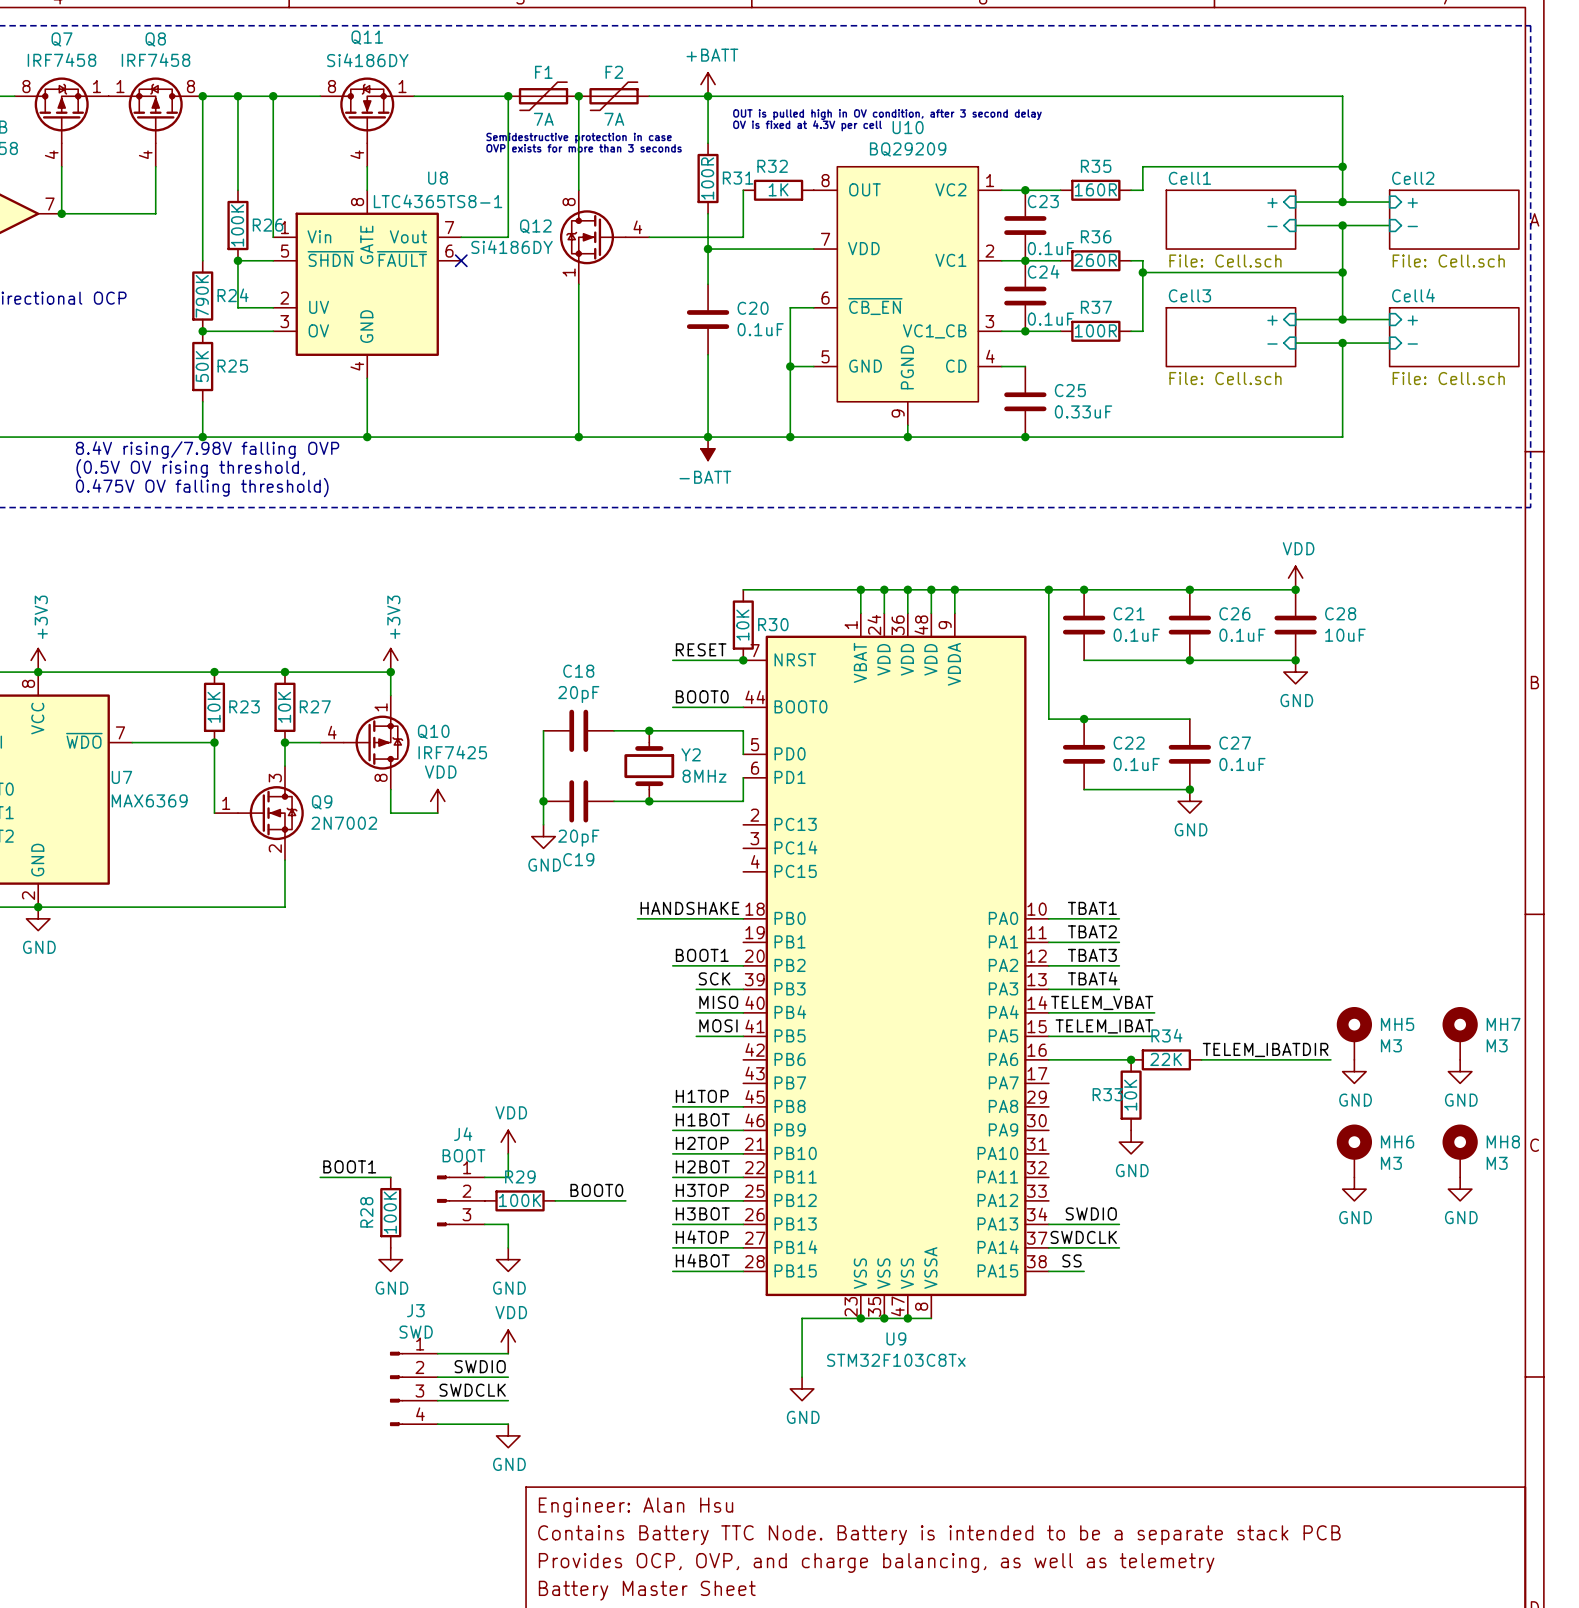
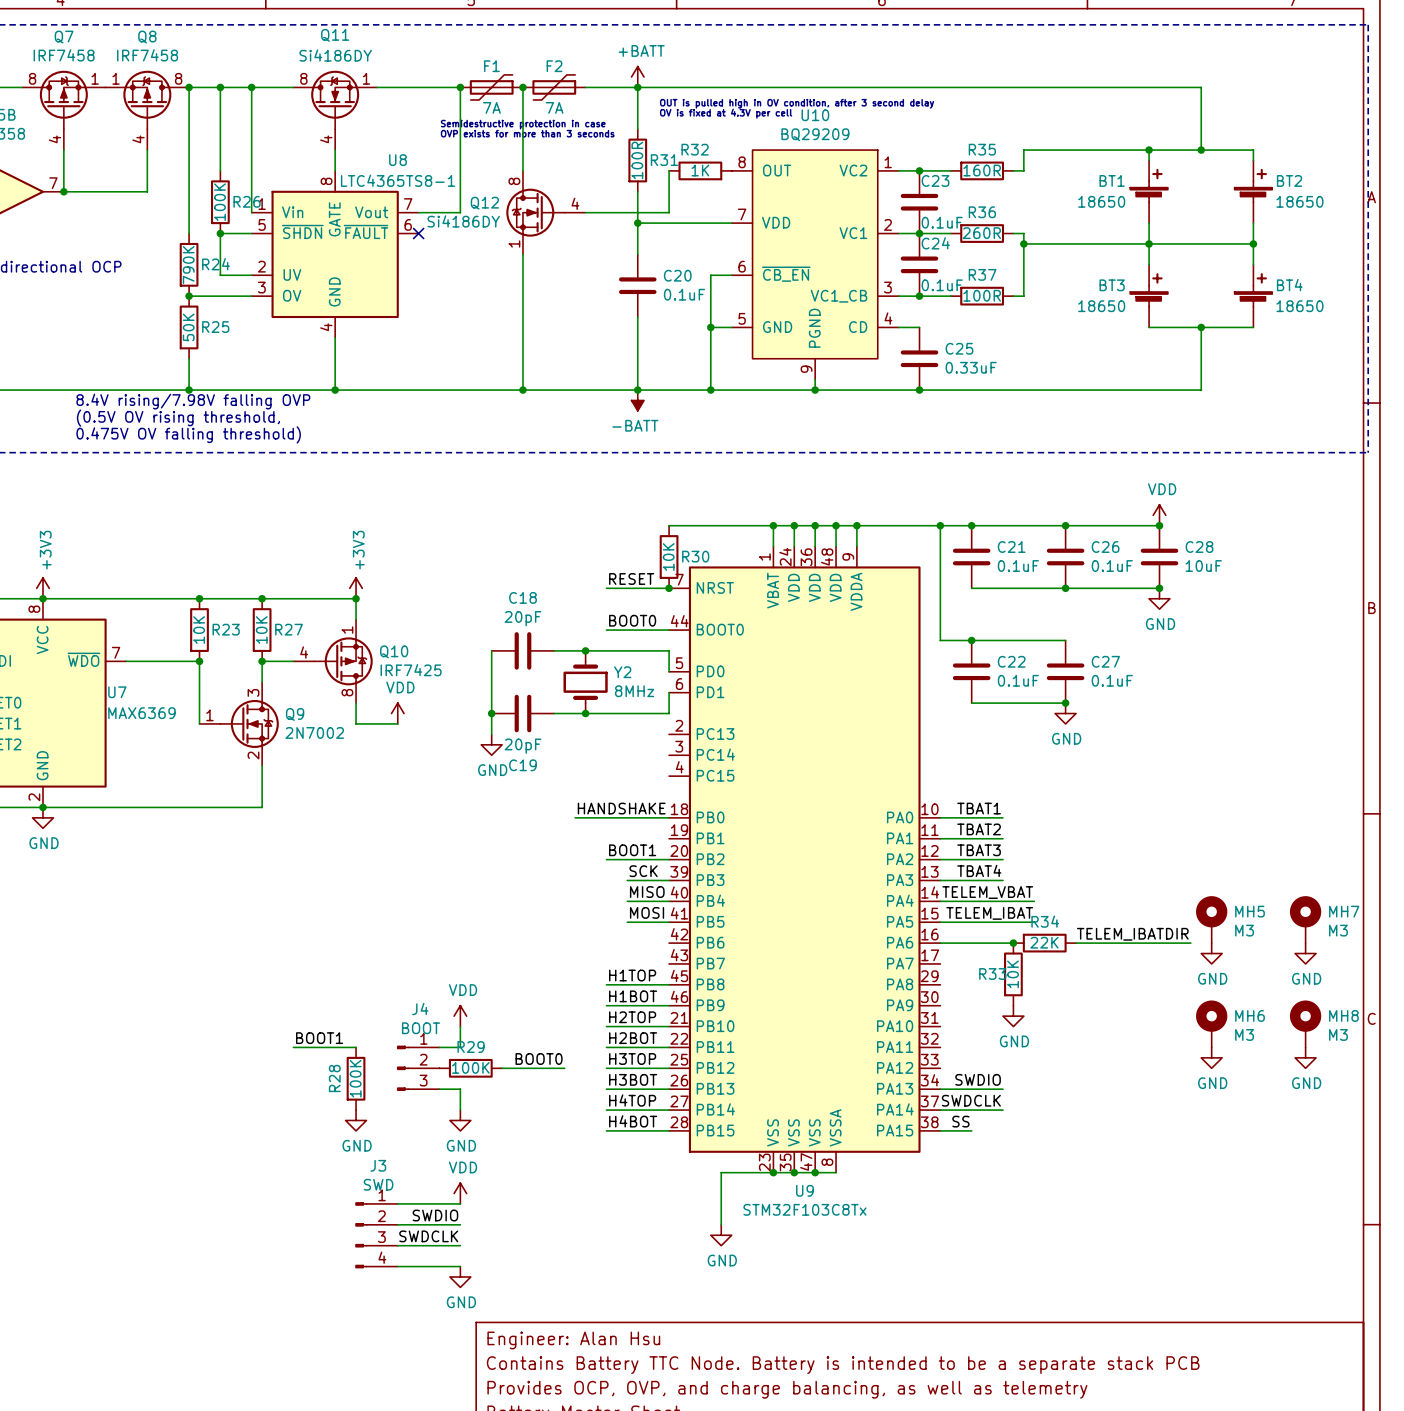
wire: none -> (1149, 150) (1149, 160)
junction: none -> (1149, 150)
wire: (1342, 166) (1342, 202) -> (1201, 150) (1253, 150) (1253, 160)
sheet pin: + (1272, 202) -> none
wire: (1295, 202) (1389, 202) -> none
junction: (1342, 202) -> none
sheet pin: + (1412, 202) -> none
BT1: none -> 18650 (1149, 191)
BT2: none -> 18650 (1253, 191)
sheet Cell1: File: Cell.sch (1230, 219) -> none
sheet Cell2: File: Cell.sch (1454, 219) -> none
wire: (1295, 225) (1389, 225) -> none
wire: (1342, 225) (1342, 319) -> none
junction: (1342, 225) -> none
sheet pin: - (1272, 226) -> none
sheet pin: - (1412, 226) -> none
wire: none -> (1149, 223) (1149, 264)
wire: none -> (1253, 223) (1253, 264)
junction: none -> (1149, 243)
wire: none -> (1201, 243) (1253, 243)
junction: (1342, 272) -> none
junction: none -> (1253, 243)
wire: (1295, 319) (1389, 319) -> none
junction: (1342, 319) -> none
sheet pin: + (1272, 320) -> none
sheet pin: + (1412, 320) -> none
BT3: none -> 18650 (1149, 296)
BT4: none -> 18650 (1253, 296)
sheet Cell3: File: Cell.sch (1230, 337) -> none
sheet Cell4: File: Cell.sch (1454, 337) -> none
wire: (1295, 343) (1389, 343) -> none
wire: (1342, 343) (1342, 366) -> none
junction: (1342, 343) -> none
sheet pin: - (1272, 344) -> none
sheet pin: - (1412, 344) -> none
wire: none -> (1149, 327) (1253, 327)
junction: none -> (1201, 327)

